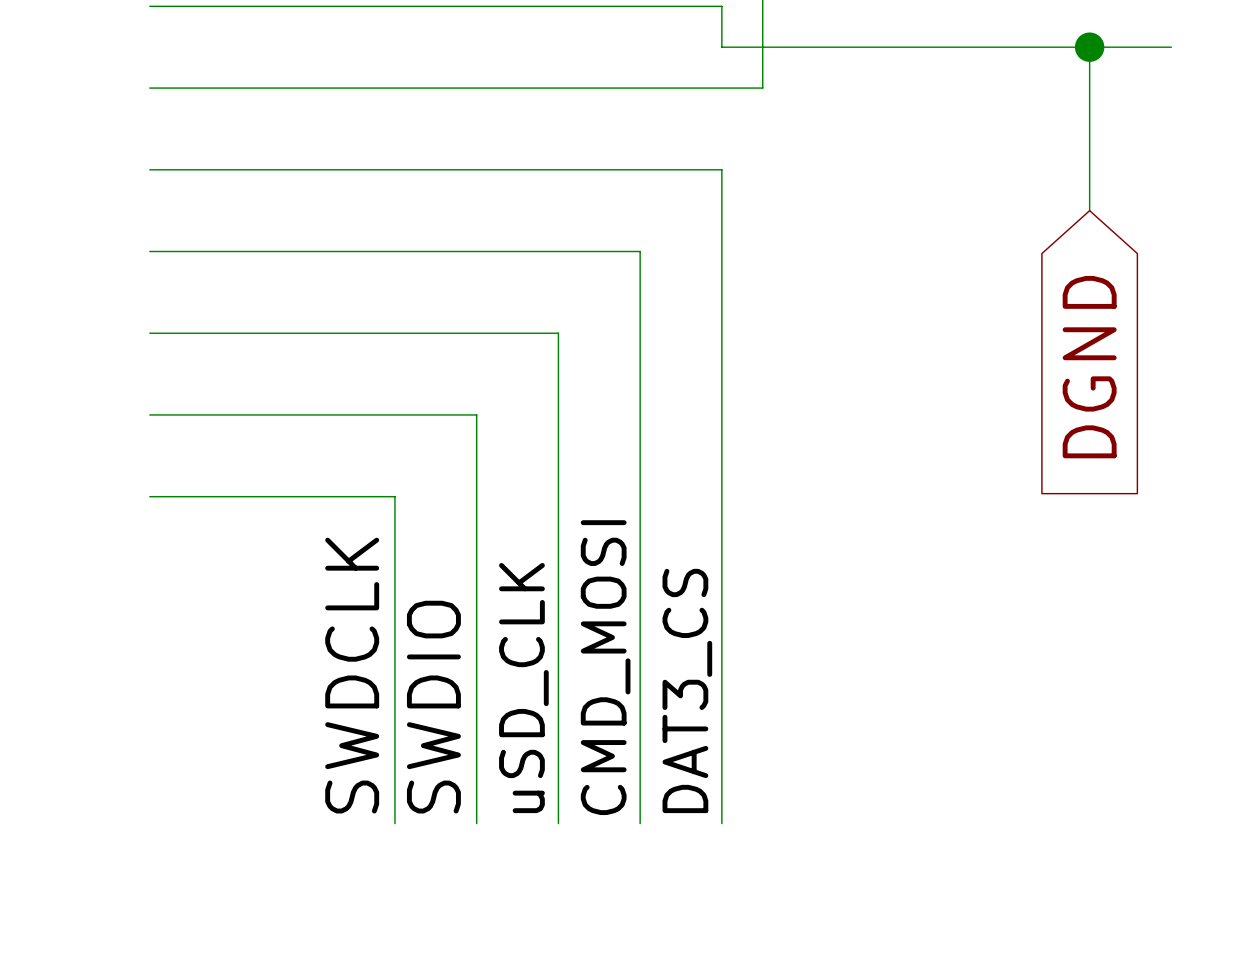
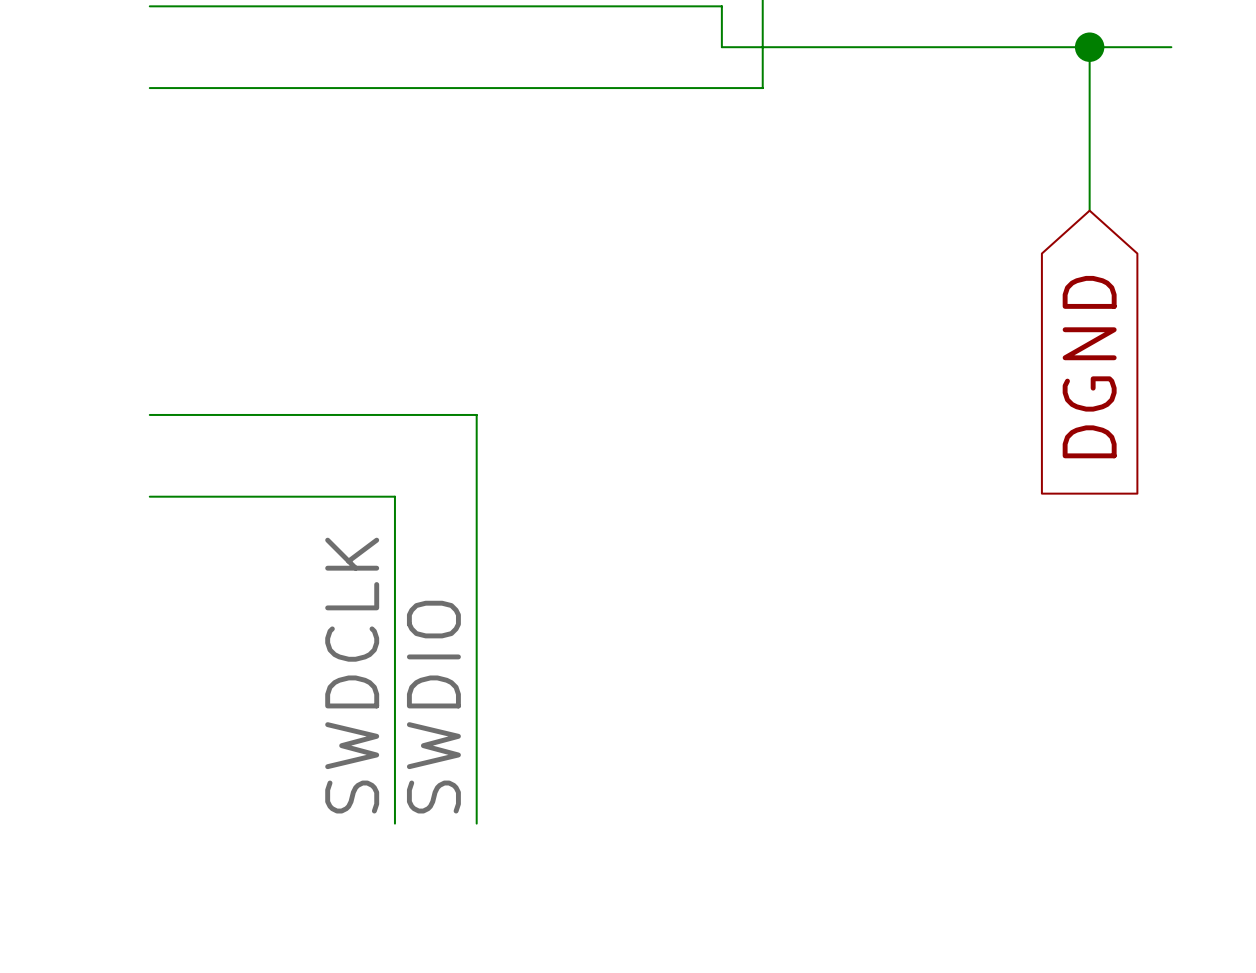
wire: (149, 169) (721, 169) (721, 823) -> none
wire: (149, 251) (640, 251) (640, 823) -> none
wire: (149, 333) (558, 333) (558, 823) -> none
label: CMD_MOSI (605, 667) -> none
label: uSD_CLK (523, 688) -> none
label: DAT3_CS (687, 690) -> none

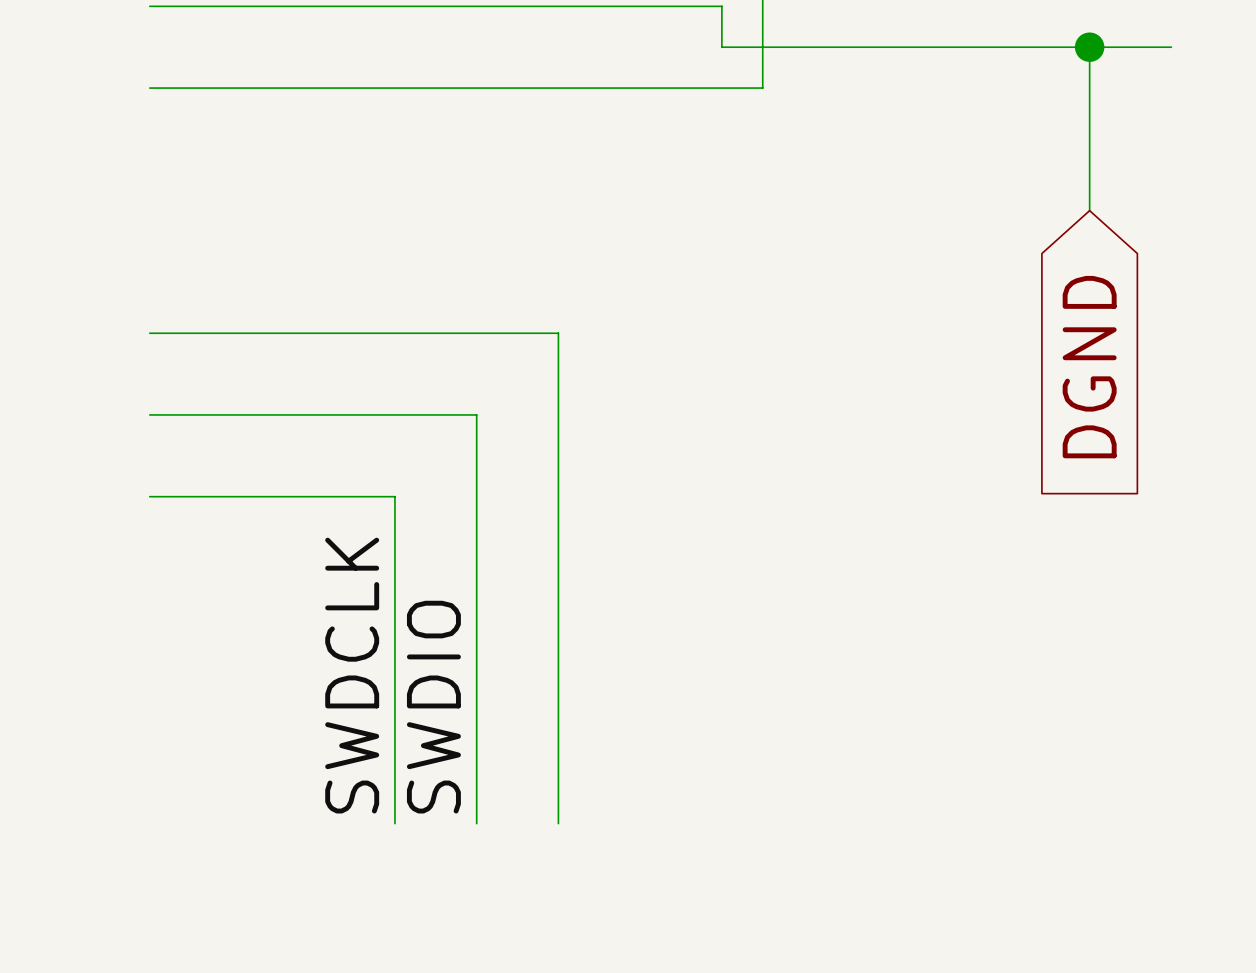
wire: none -> (149, 333) (558, 333) (558, 823)

